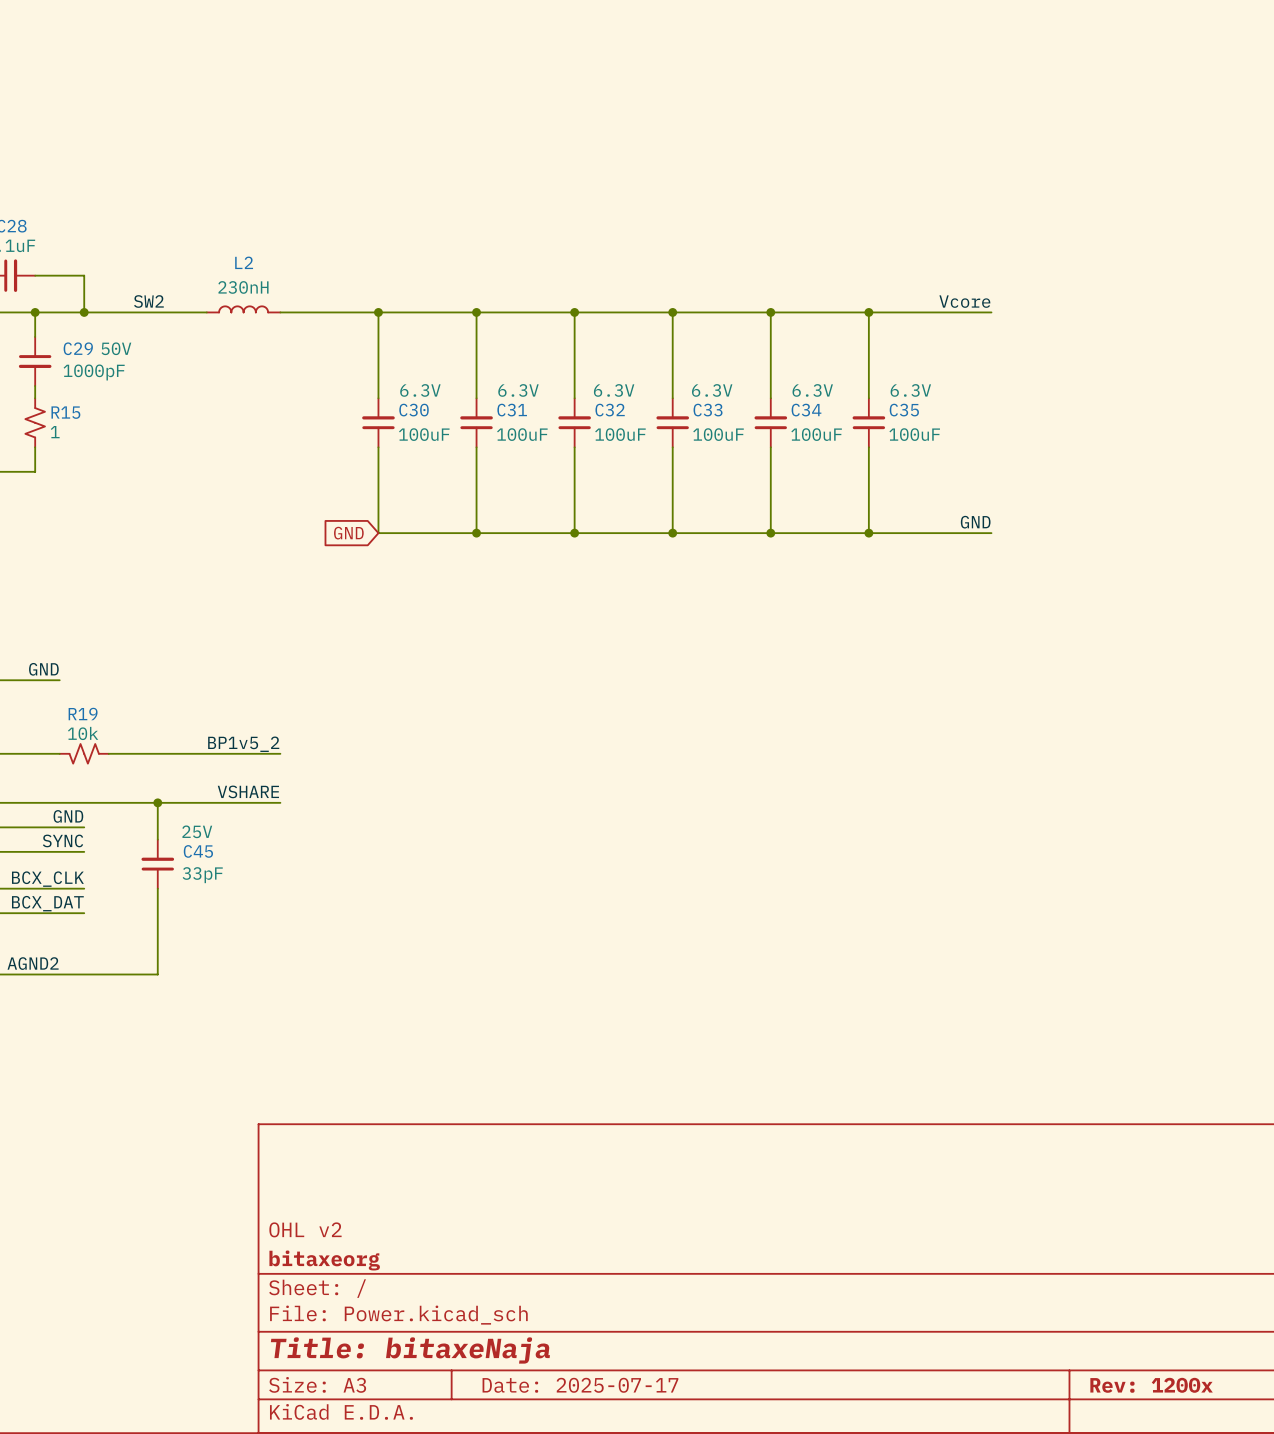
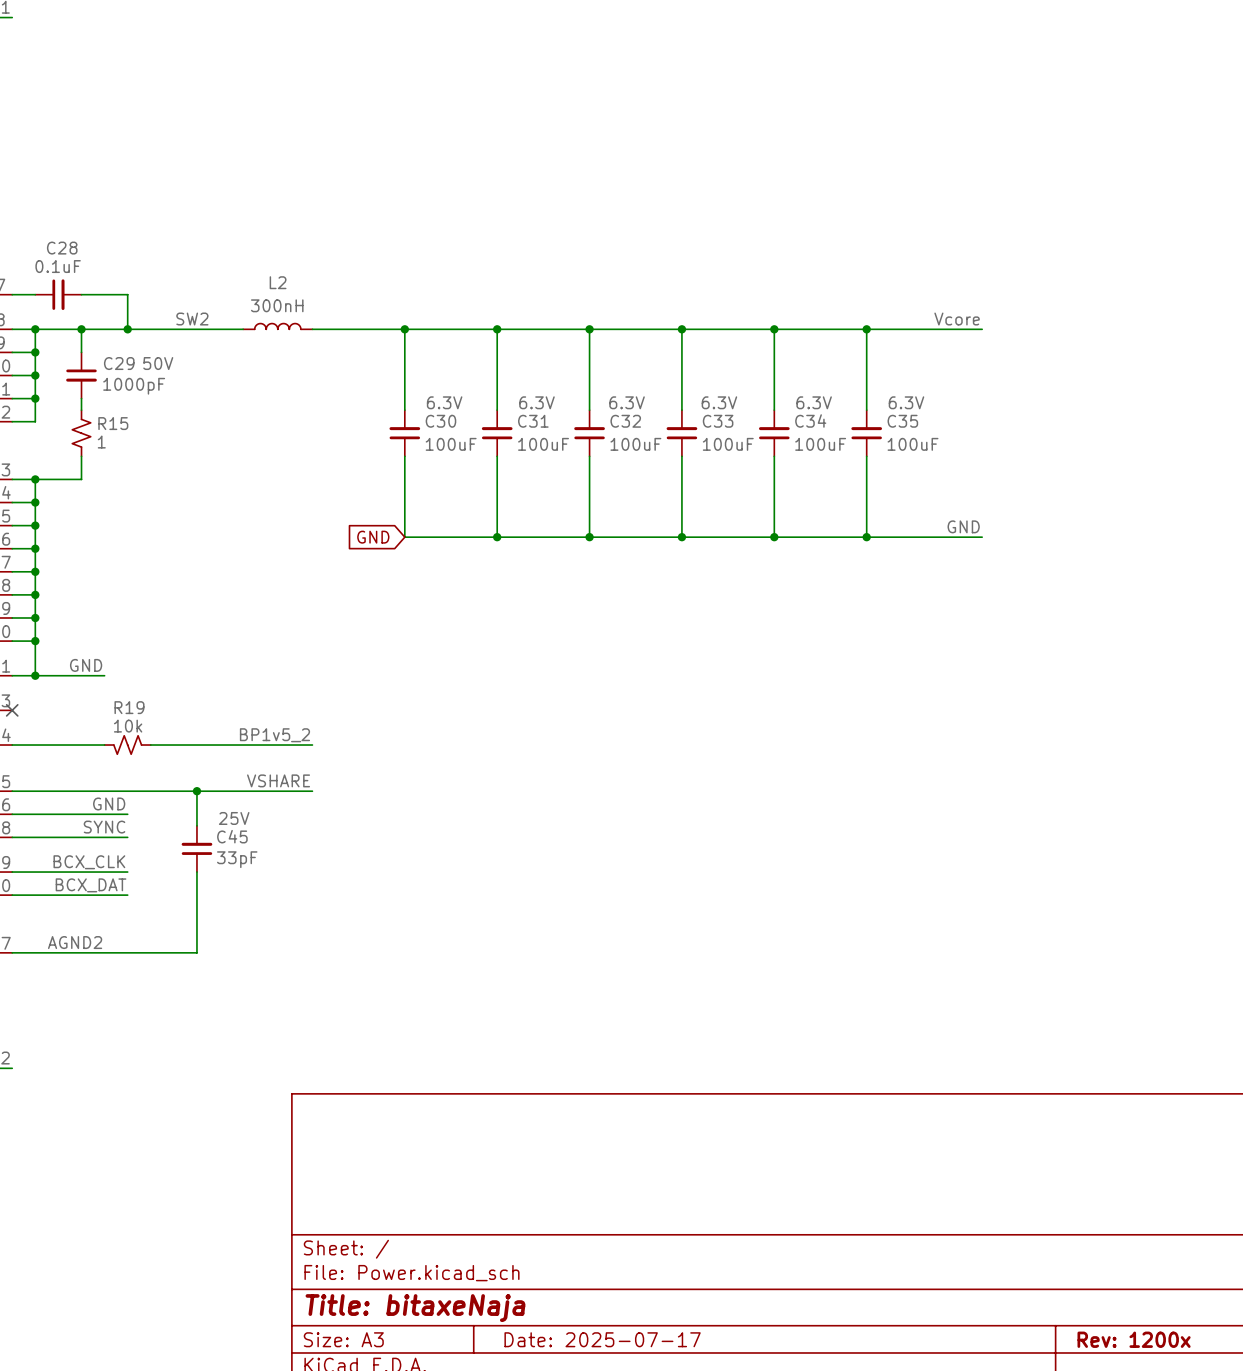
L2 value: 230nH (243, 287) -> 300nH (277, 305)
title block: OHL v2 (305, 1229) -> none
title block: bitaxeorg (324, 1260) -> none

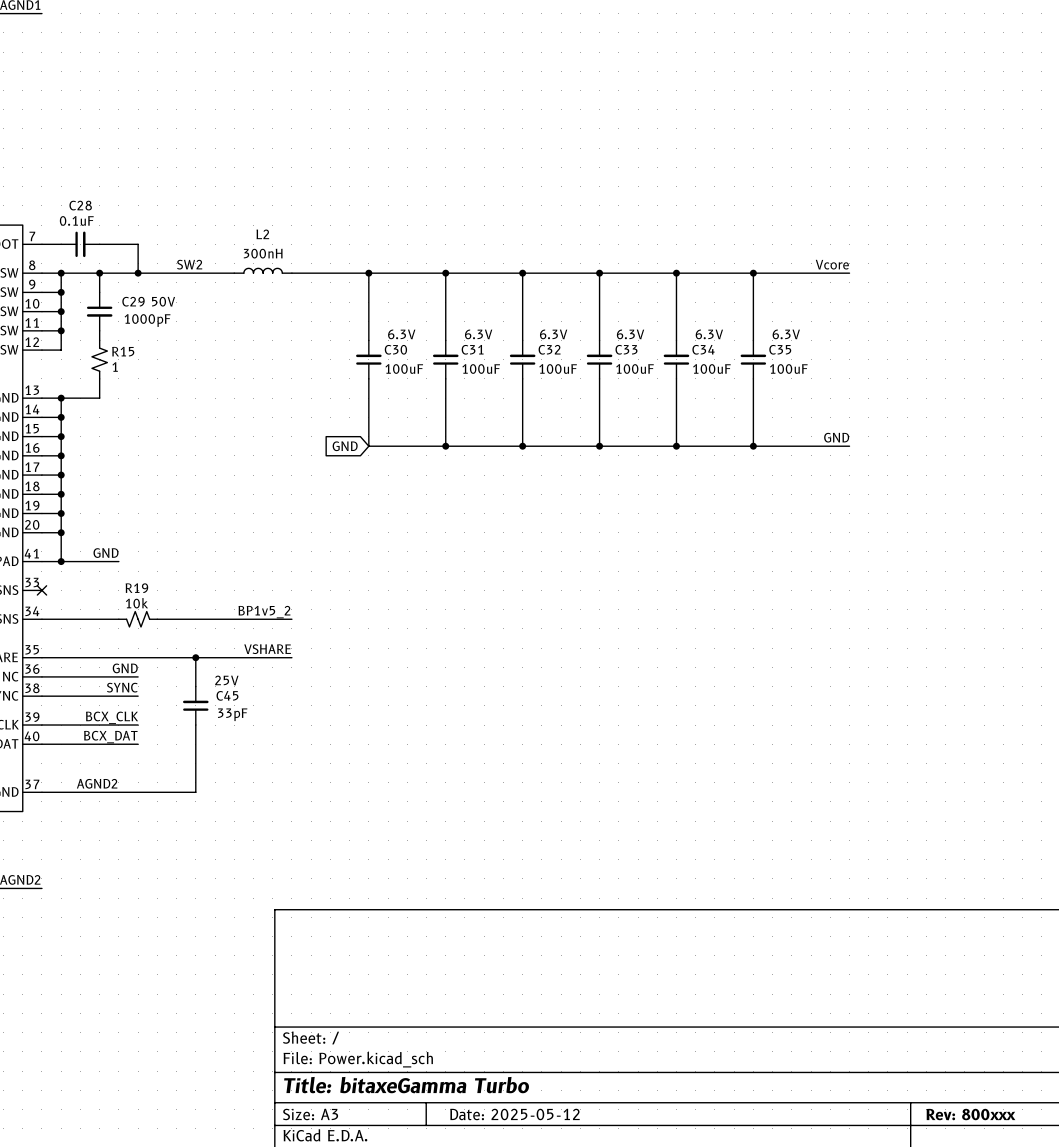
title block: Title: bitaxeNaja (415, 1308) -> Title: bitaxeGamma Turbo (406, 1085)
title block: Date: 2025-07-17 (602, 1339) -> Date: 2025-05-12 (514, 1114)
title block: Rev: 1200x (1134, 1339) -> Rev: 800xxx (970, 1114)

